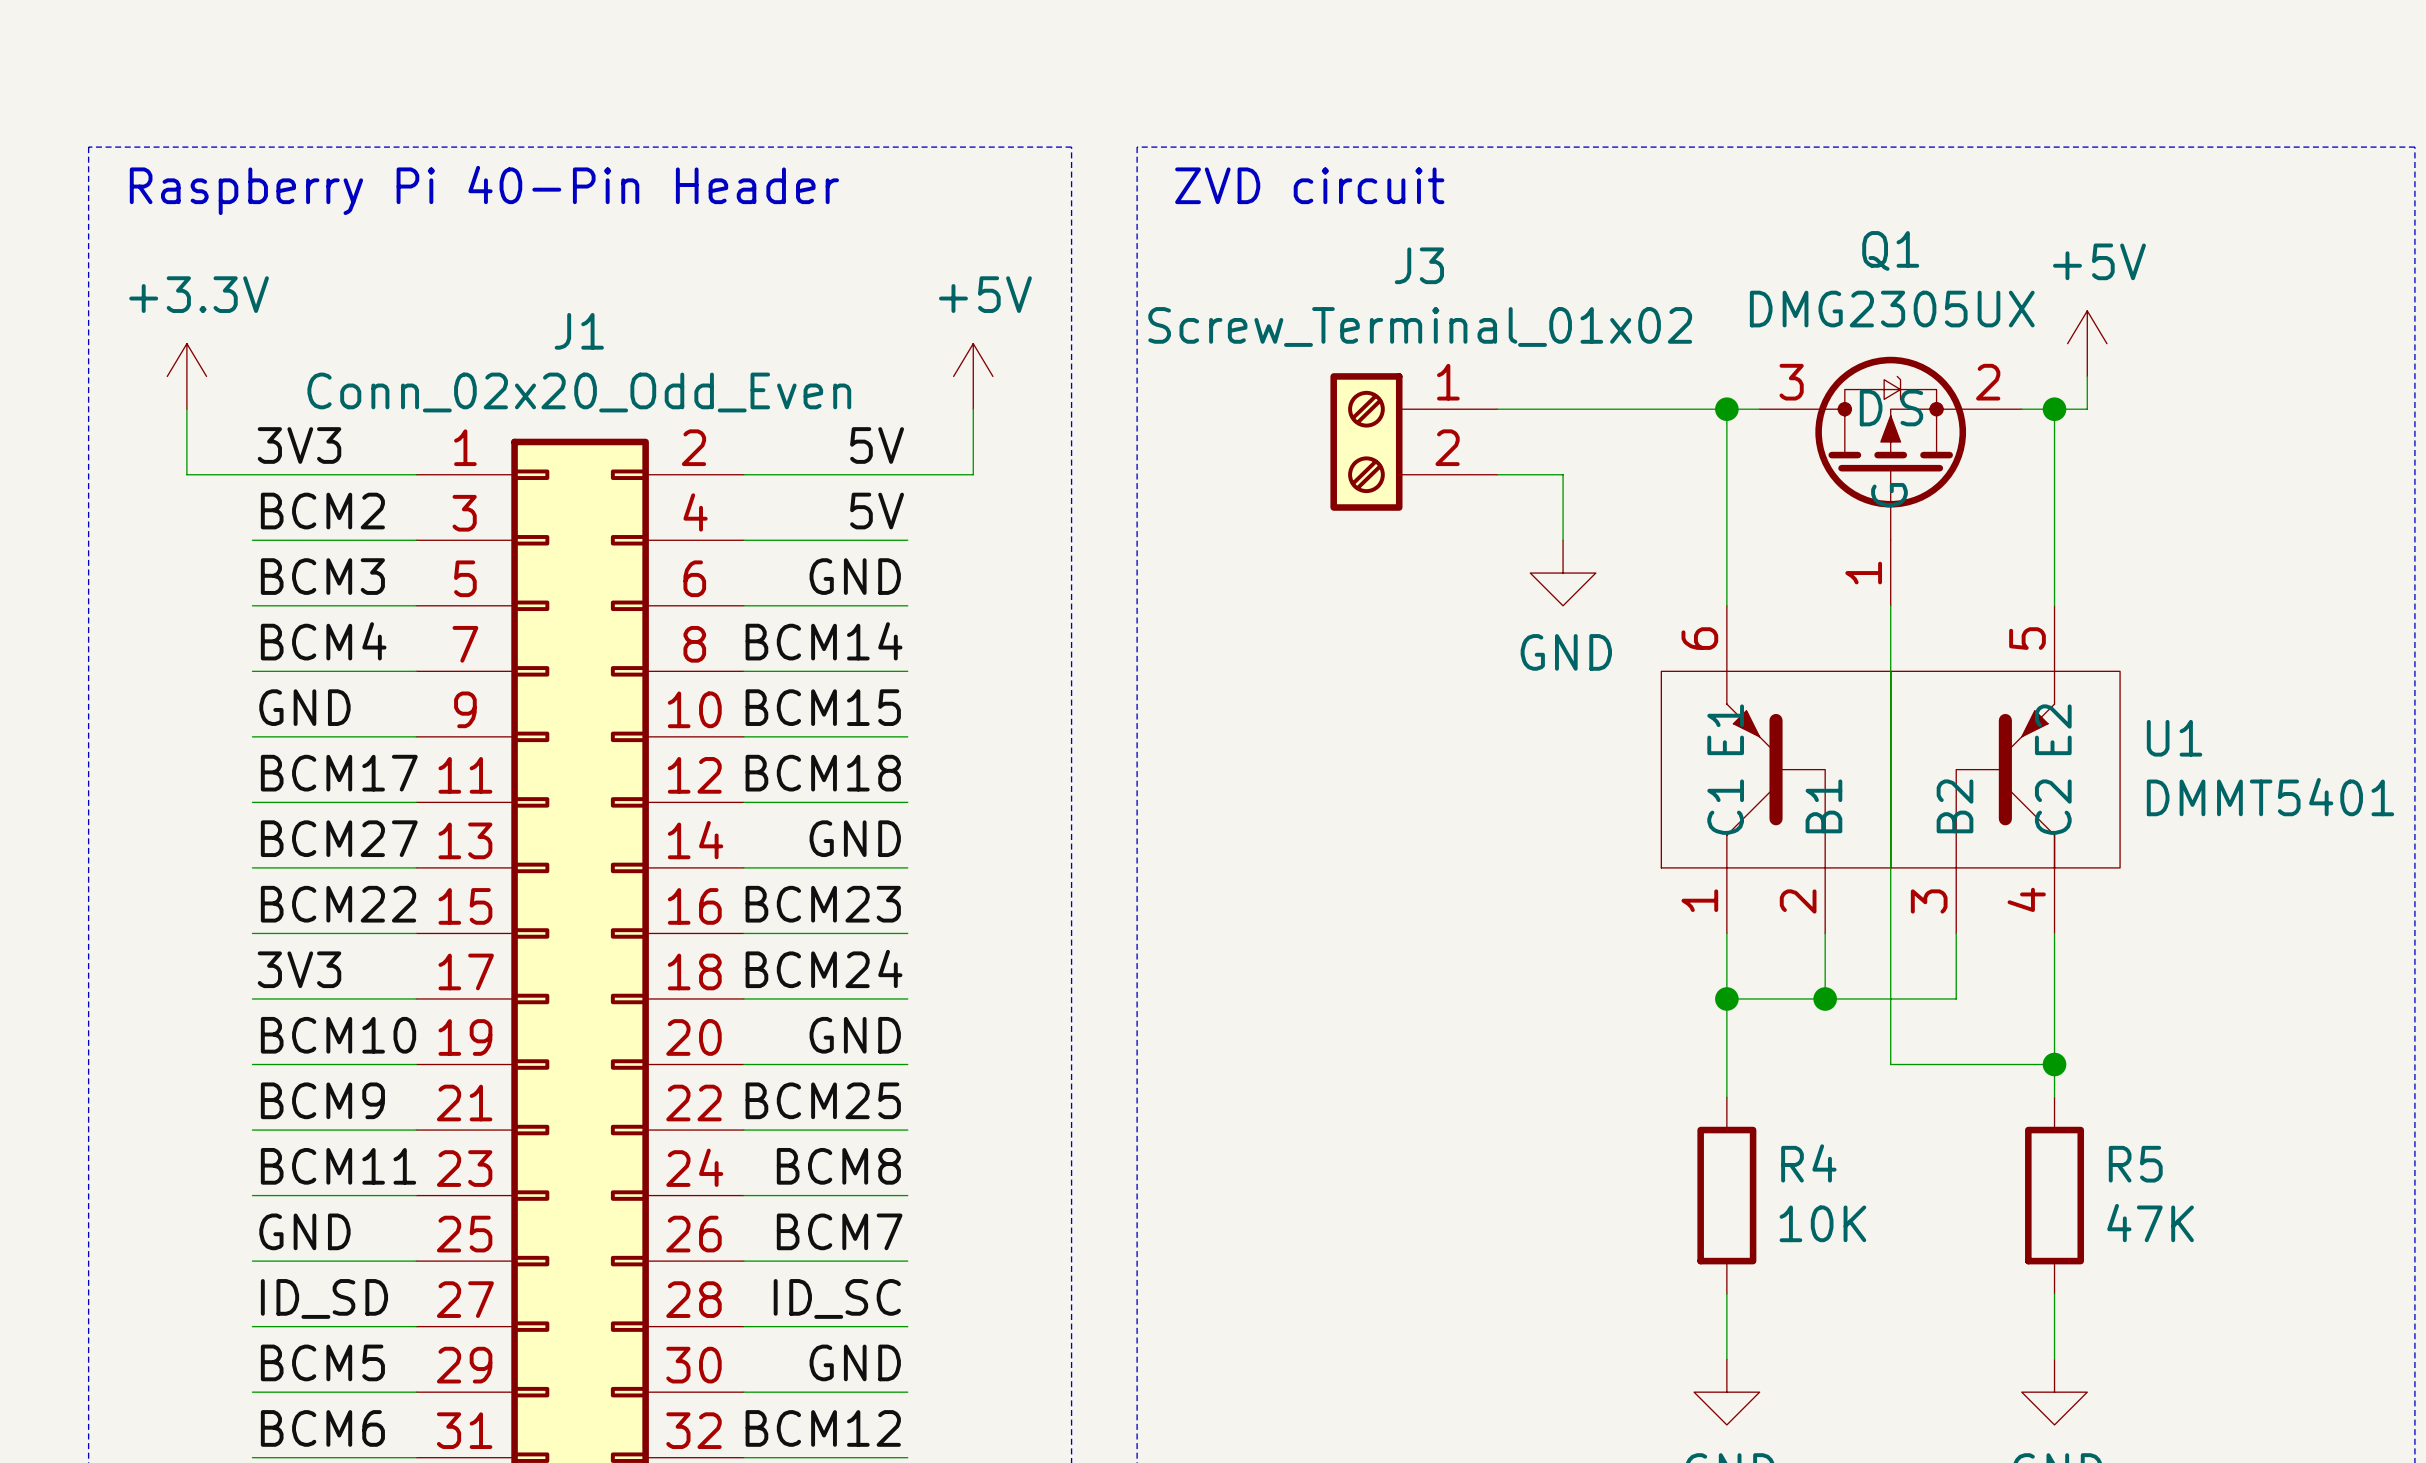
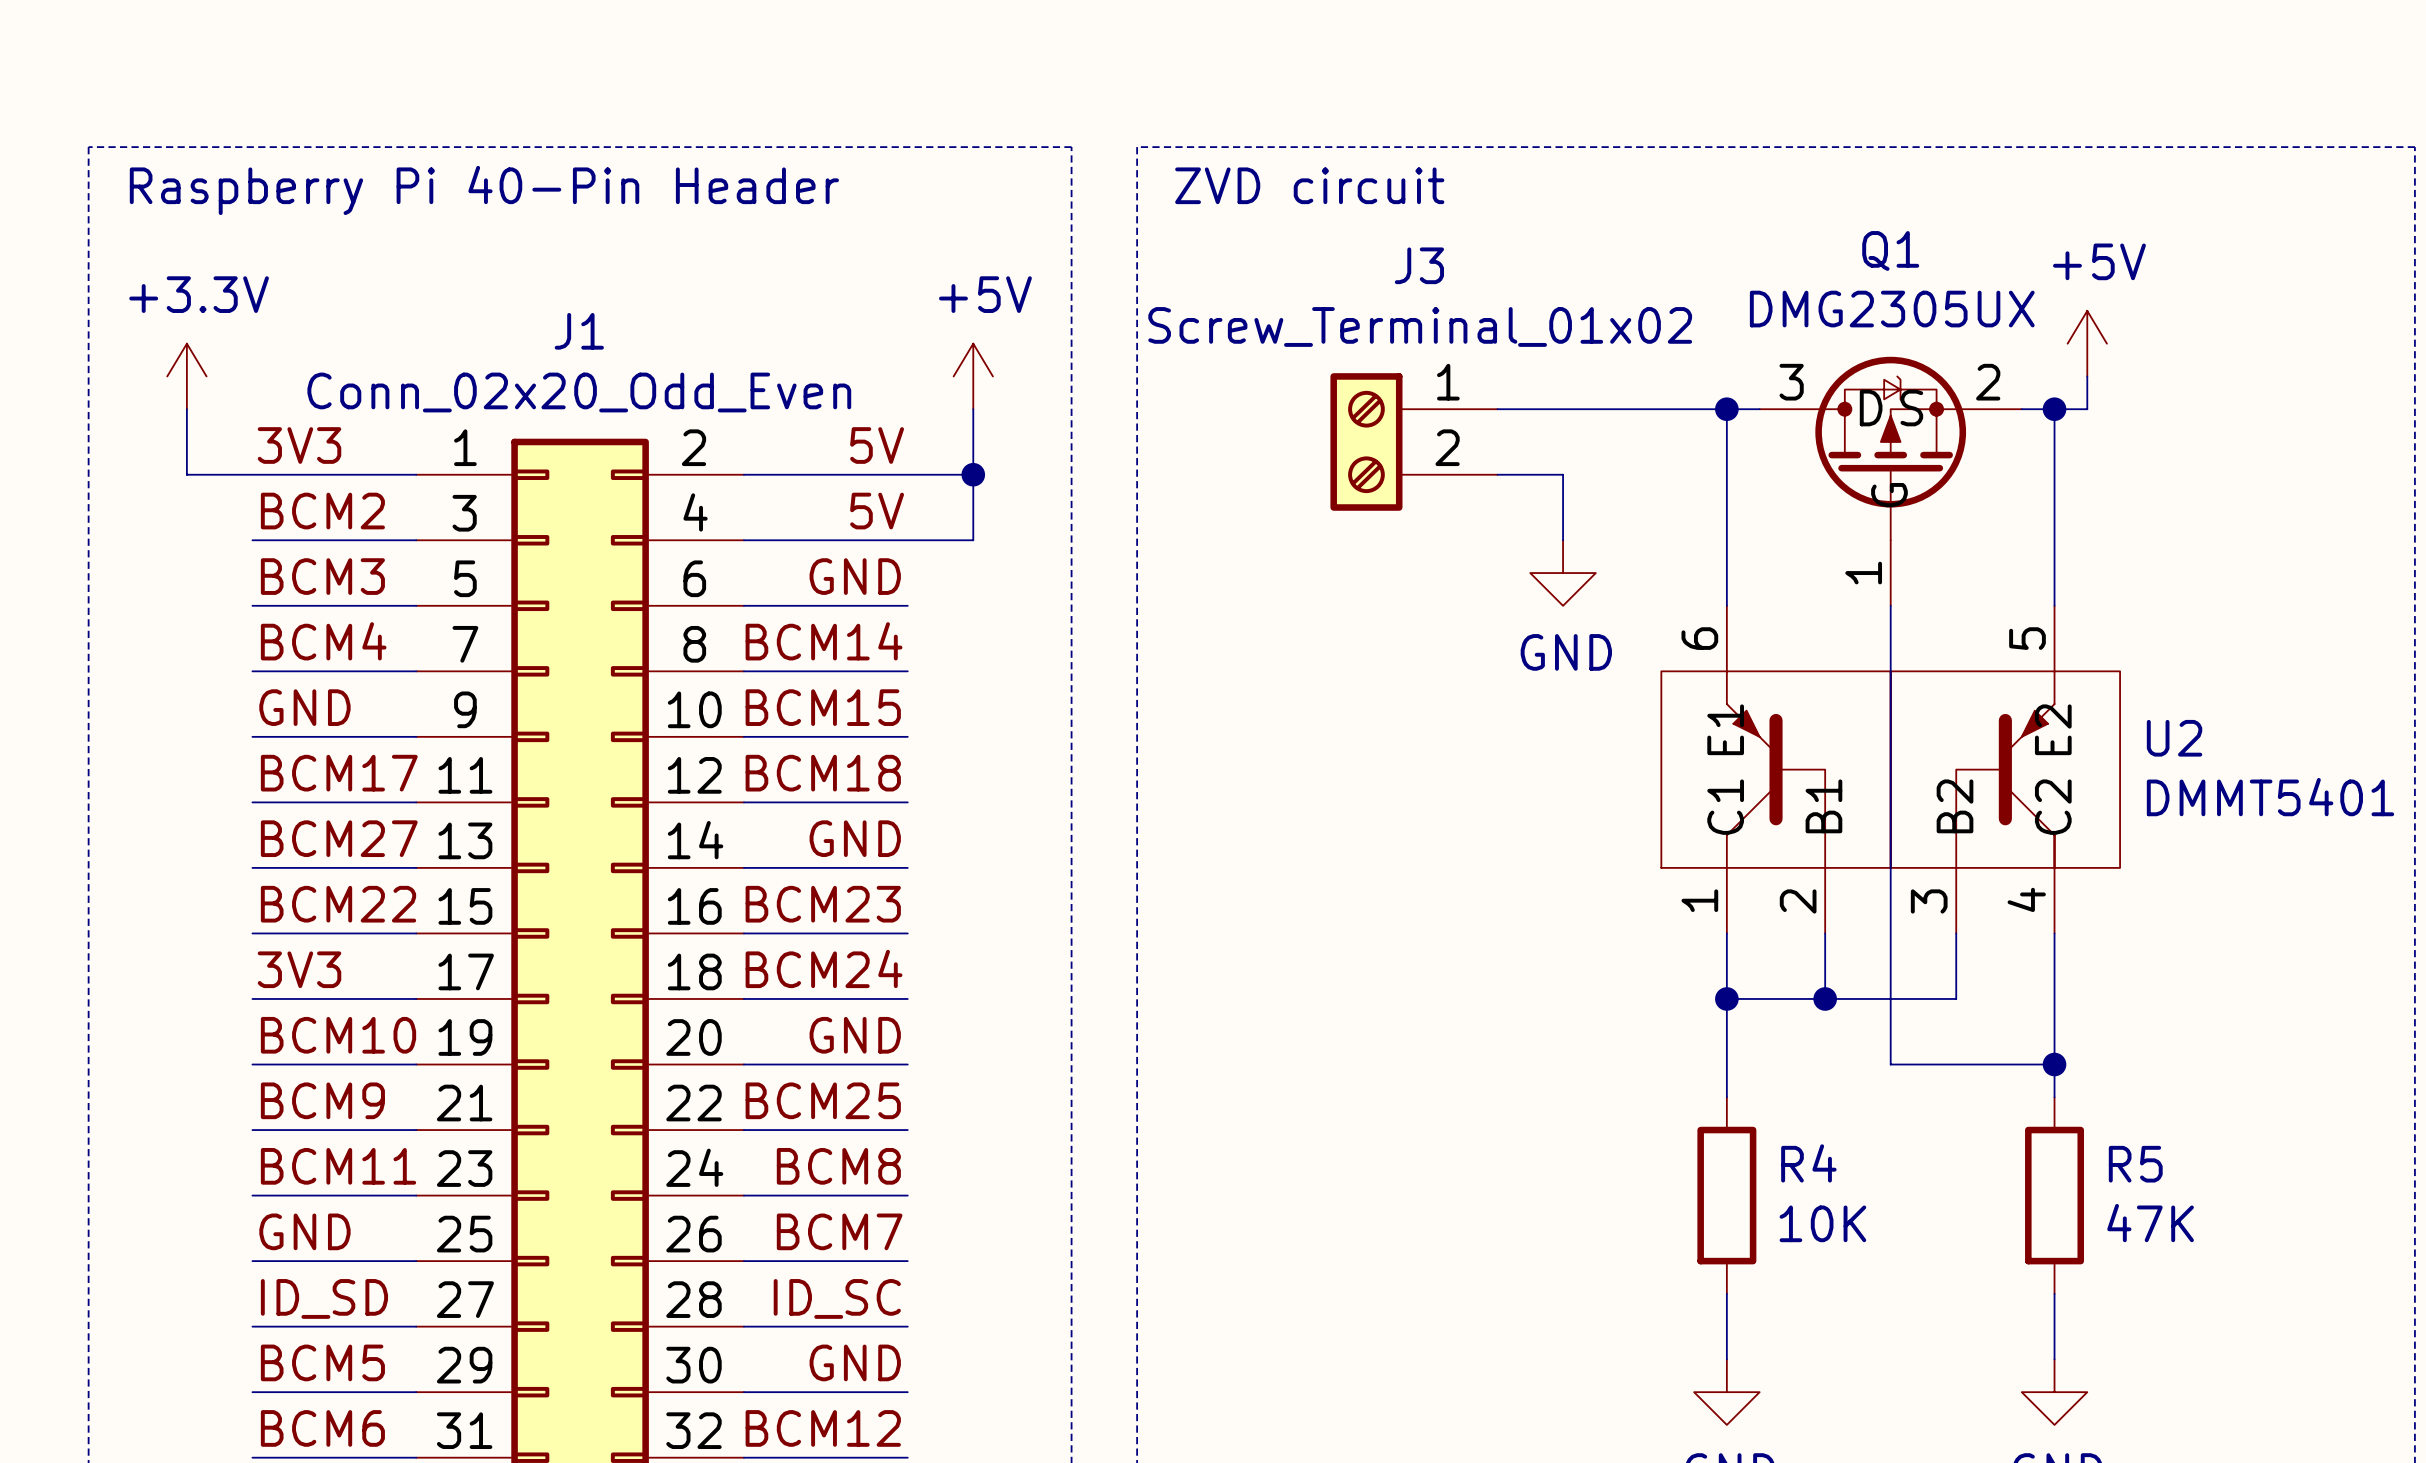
wire: none -> (973, 474) (973, 540) (907, 540)
junction: none -> (973, 474)
U1 name: U1 (2174, 738) -> U2 (2174, 738)

